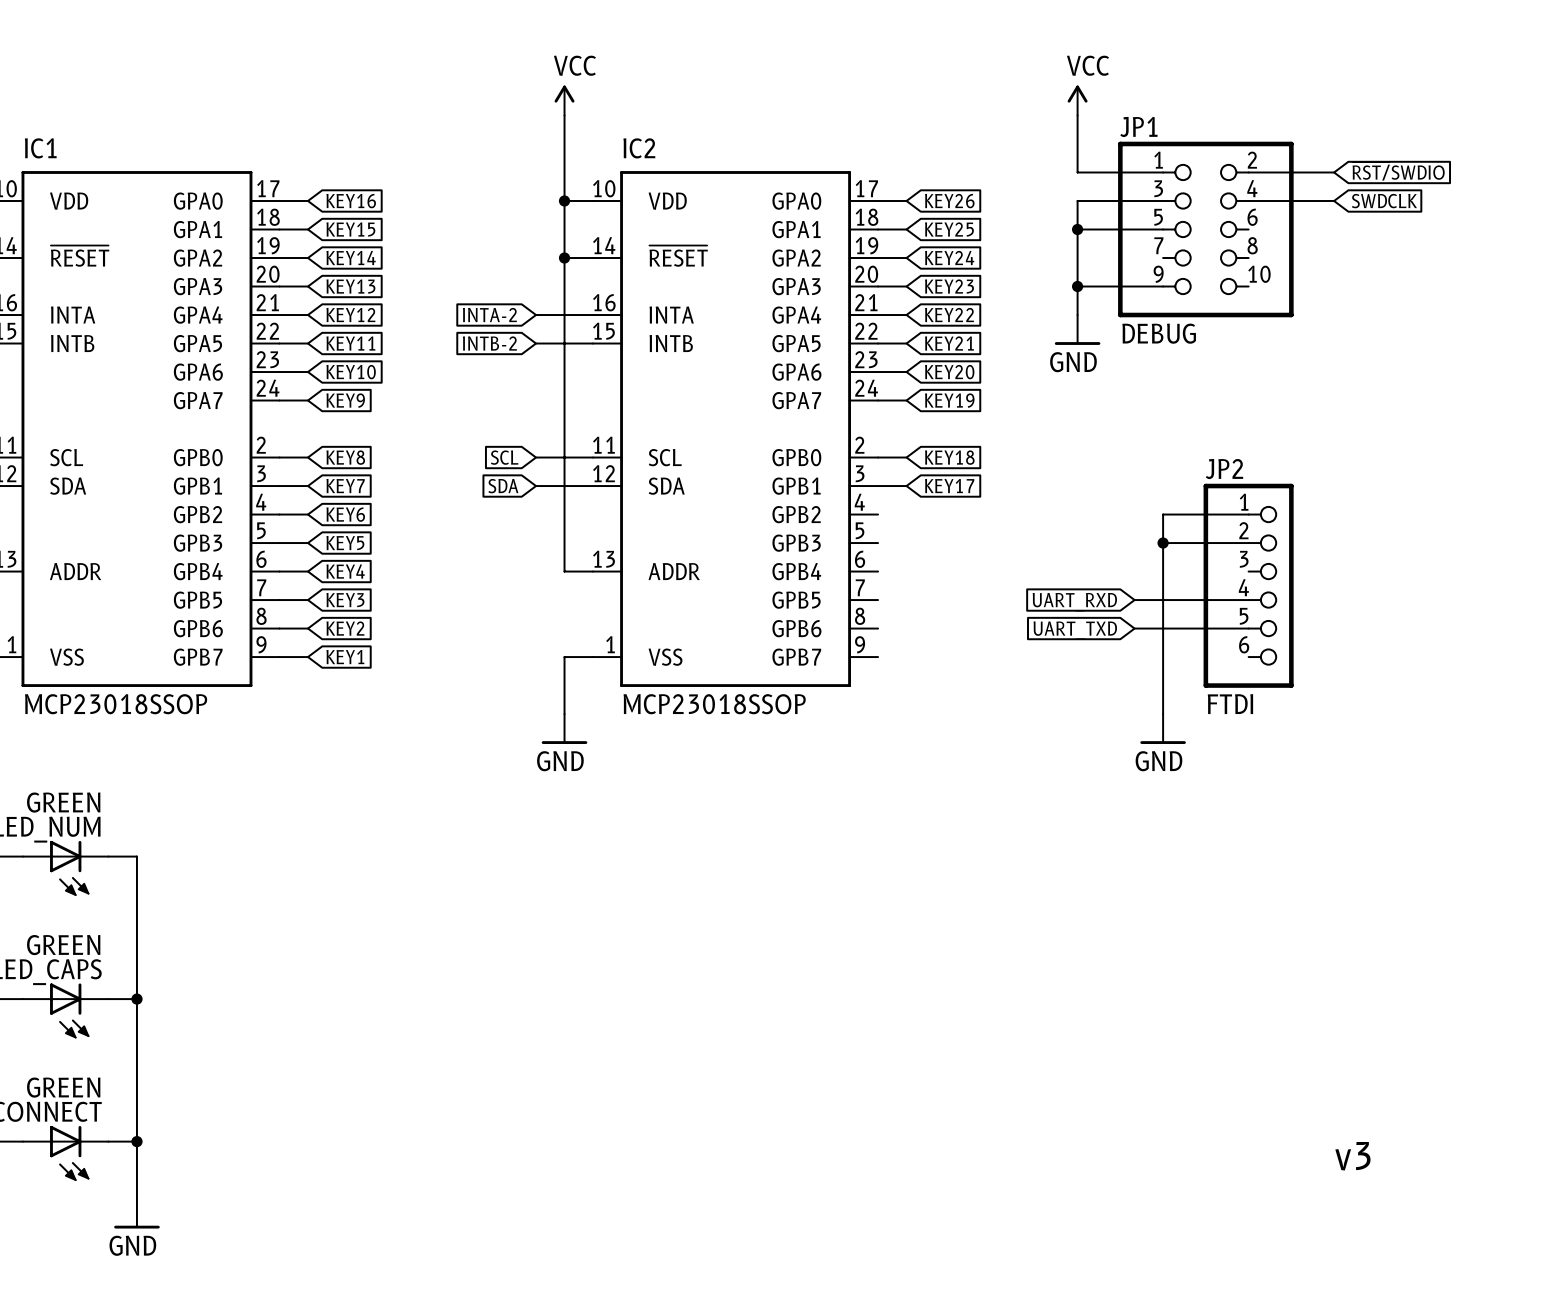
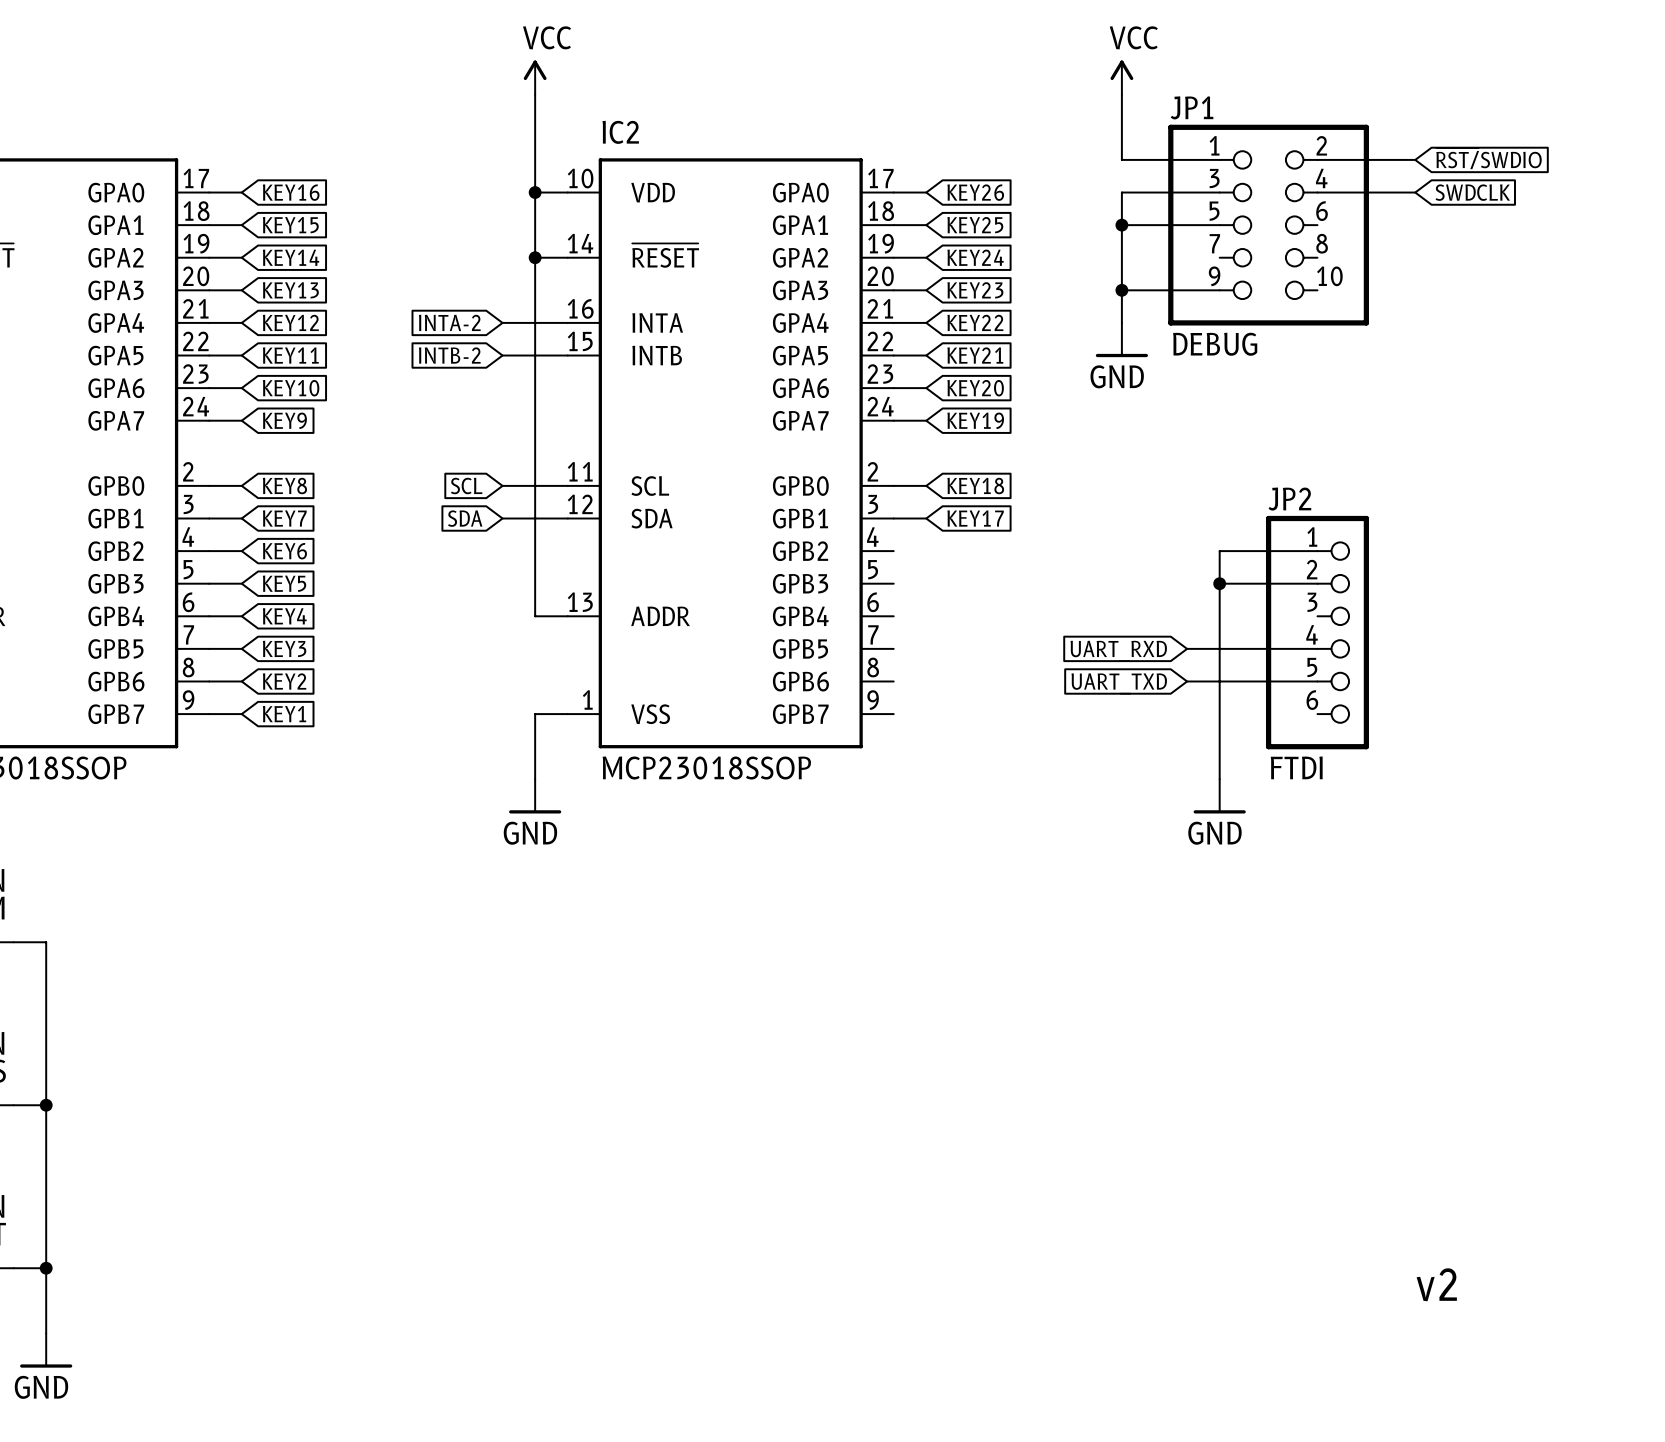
text: v3 (1352, 1156) -> v2 (1436, 1284)

